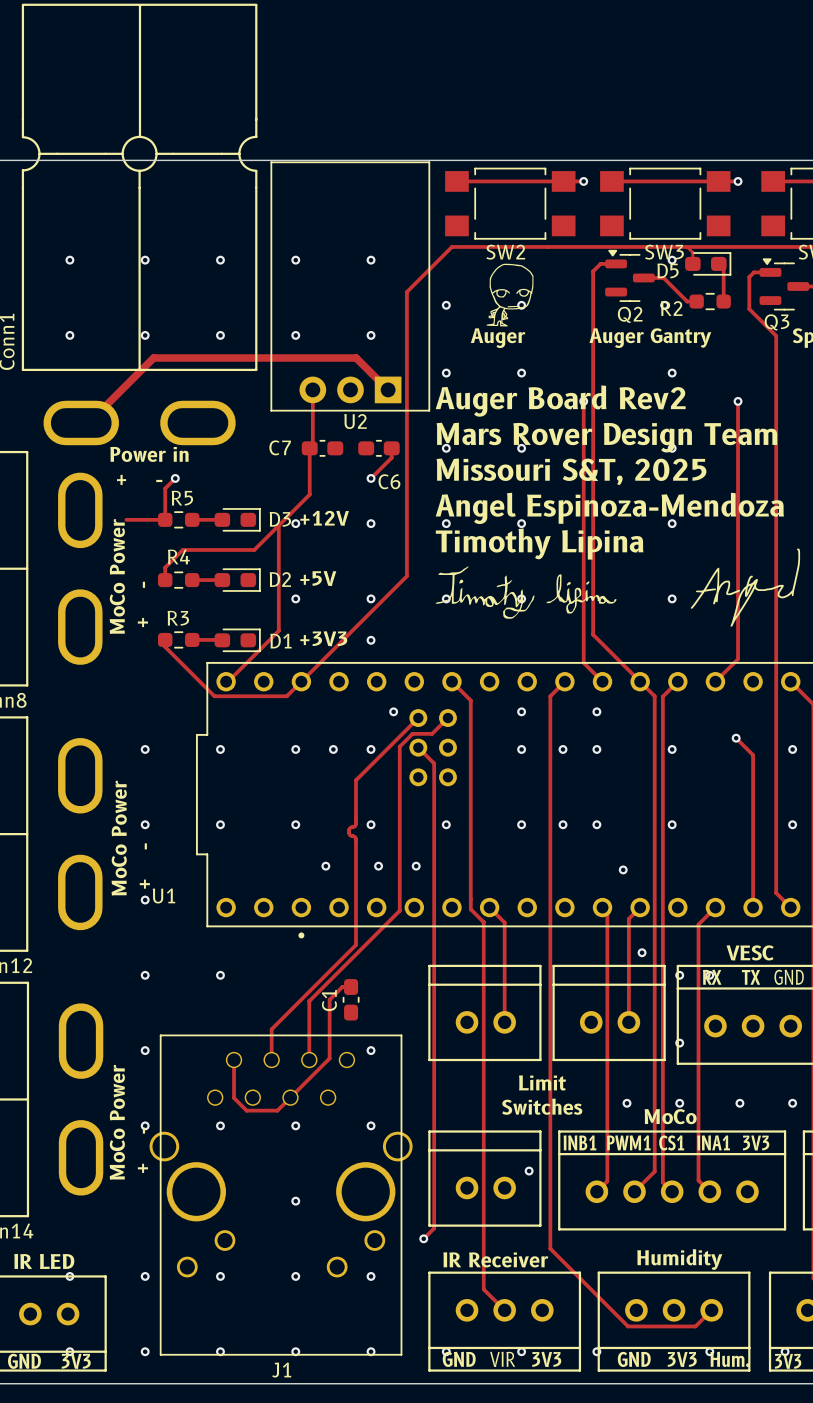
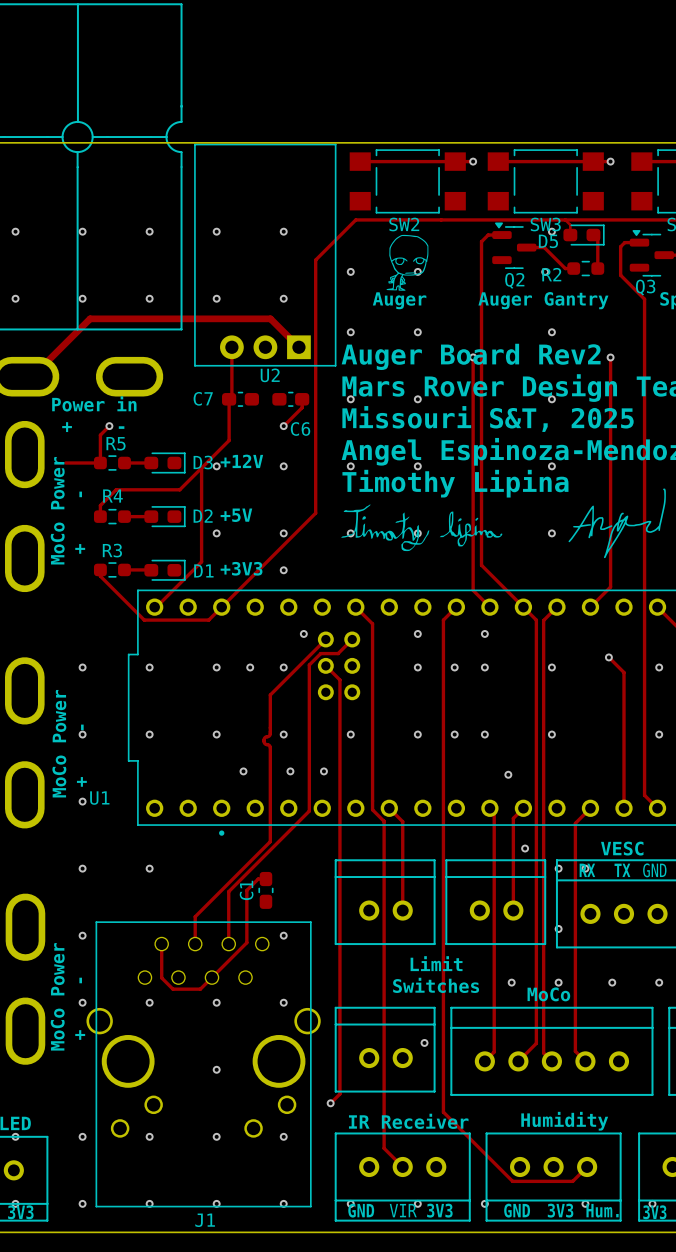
text: INB1 (579, 1142) -> none
text: PWM1 (628, 1142) -> none
text: CS1 (671, 1142) -> none
text: INA1 (713, 1142) -> none
text: 3V3 (756, 1142) -> none

